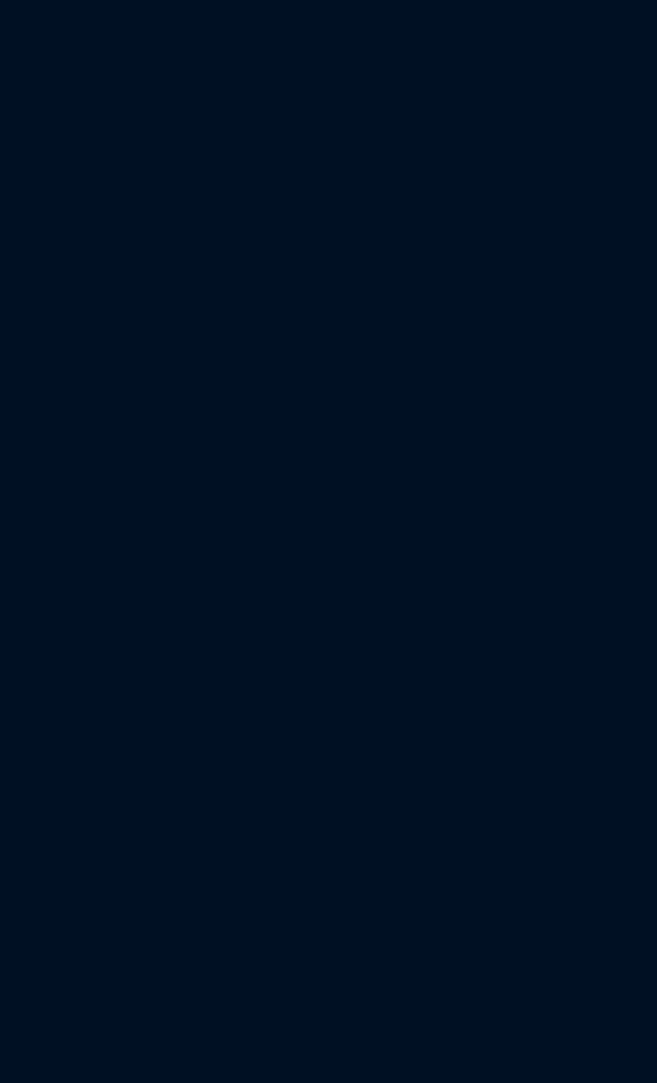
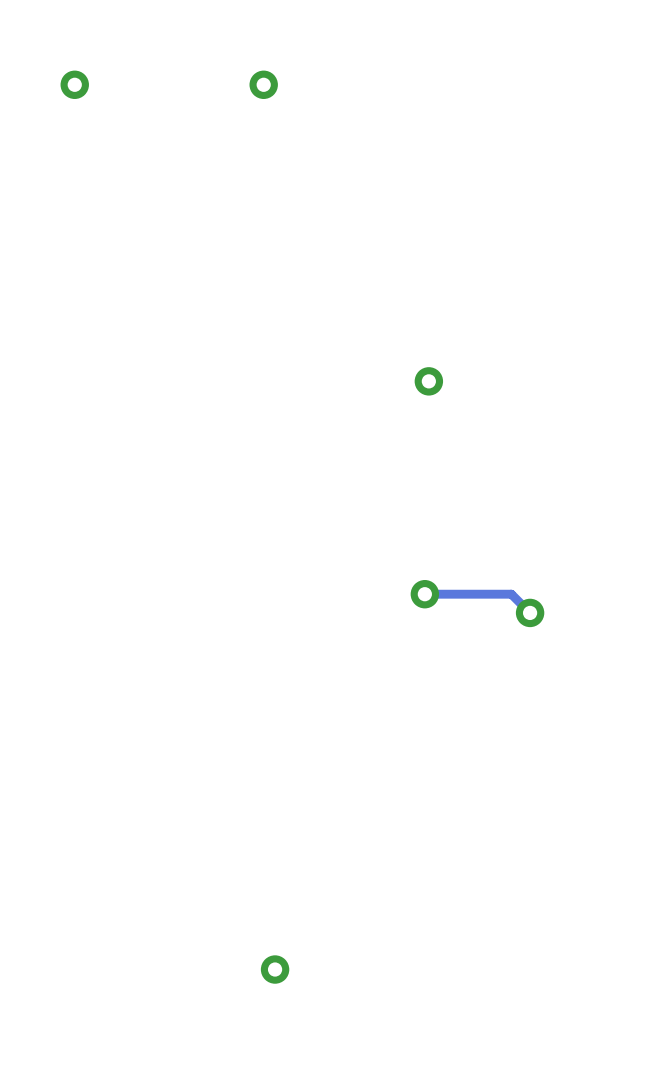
via: none -> (74, 84)
via: none -> (263, 84)
via: none -> (428, 381)
track: none -> (424, 594) (511, 594) (530, 612)
via: none -> (424, 594)
via: none -> (530, 612)
via: none -> (275, 969)

